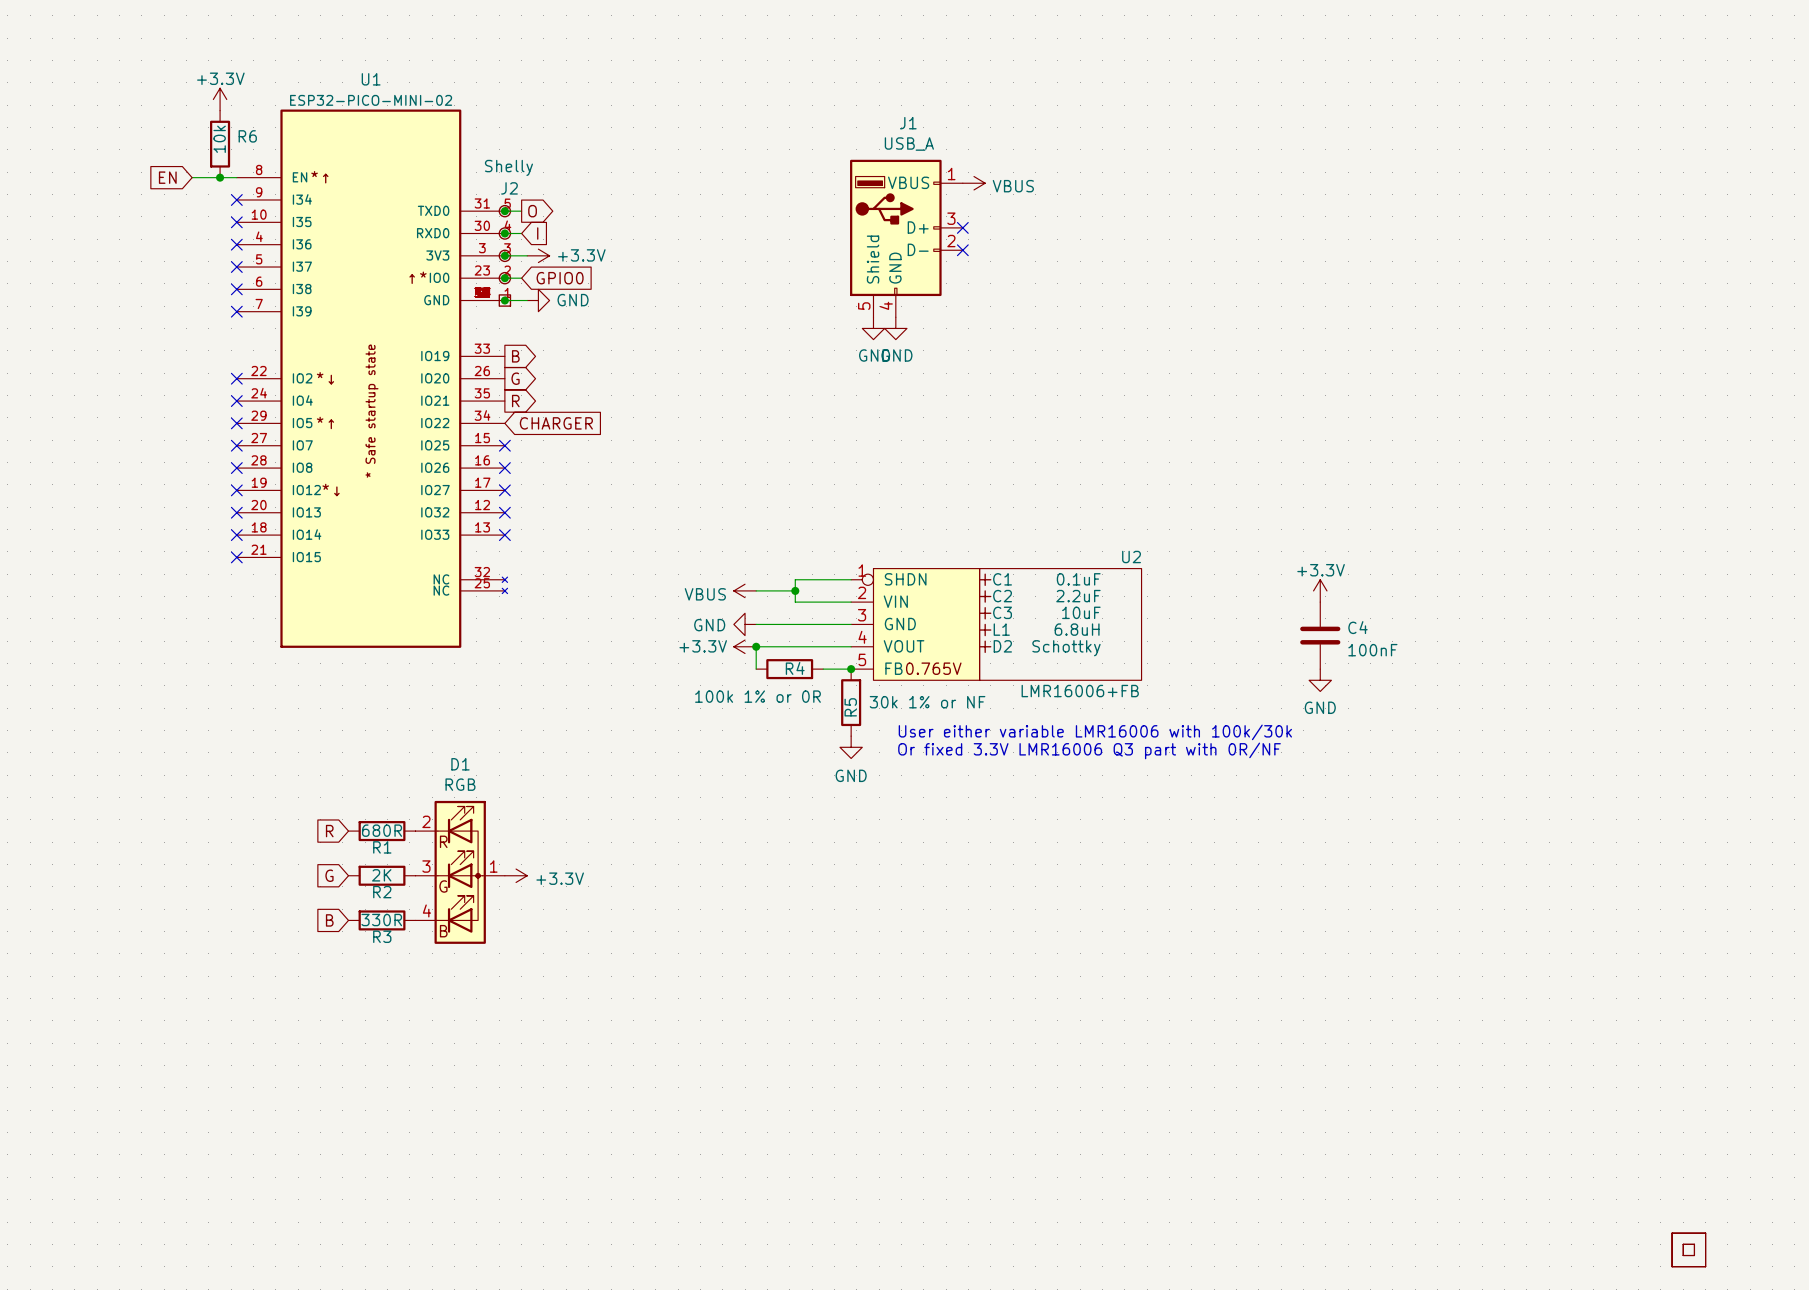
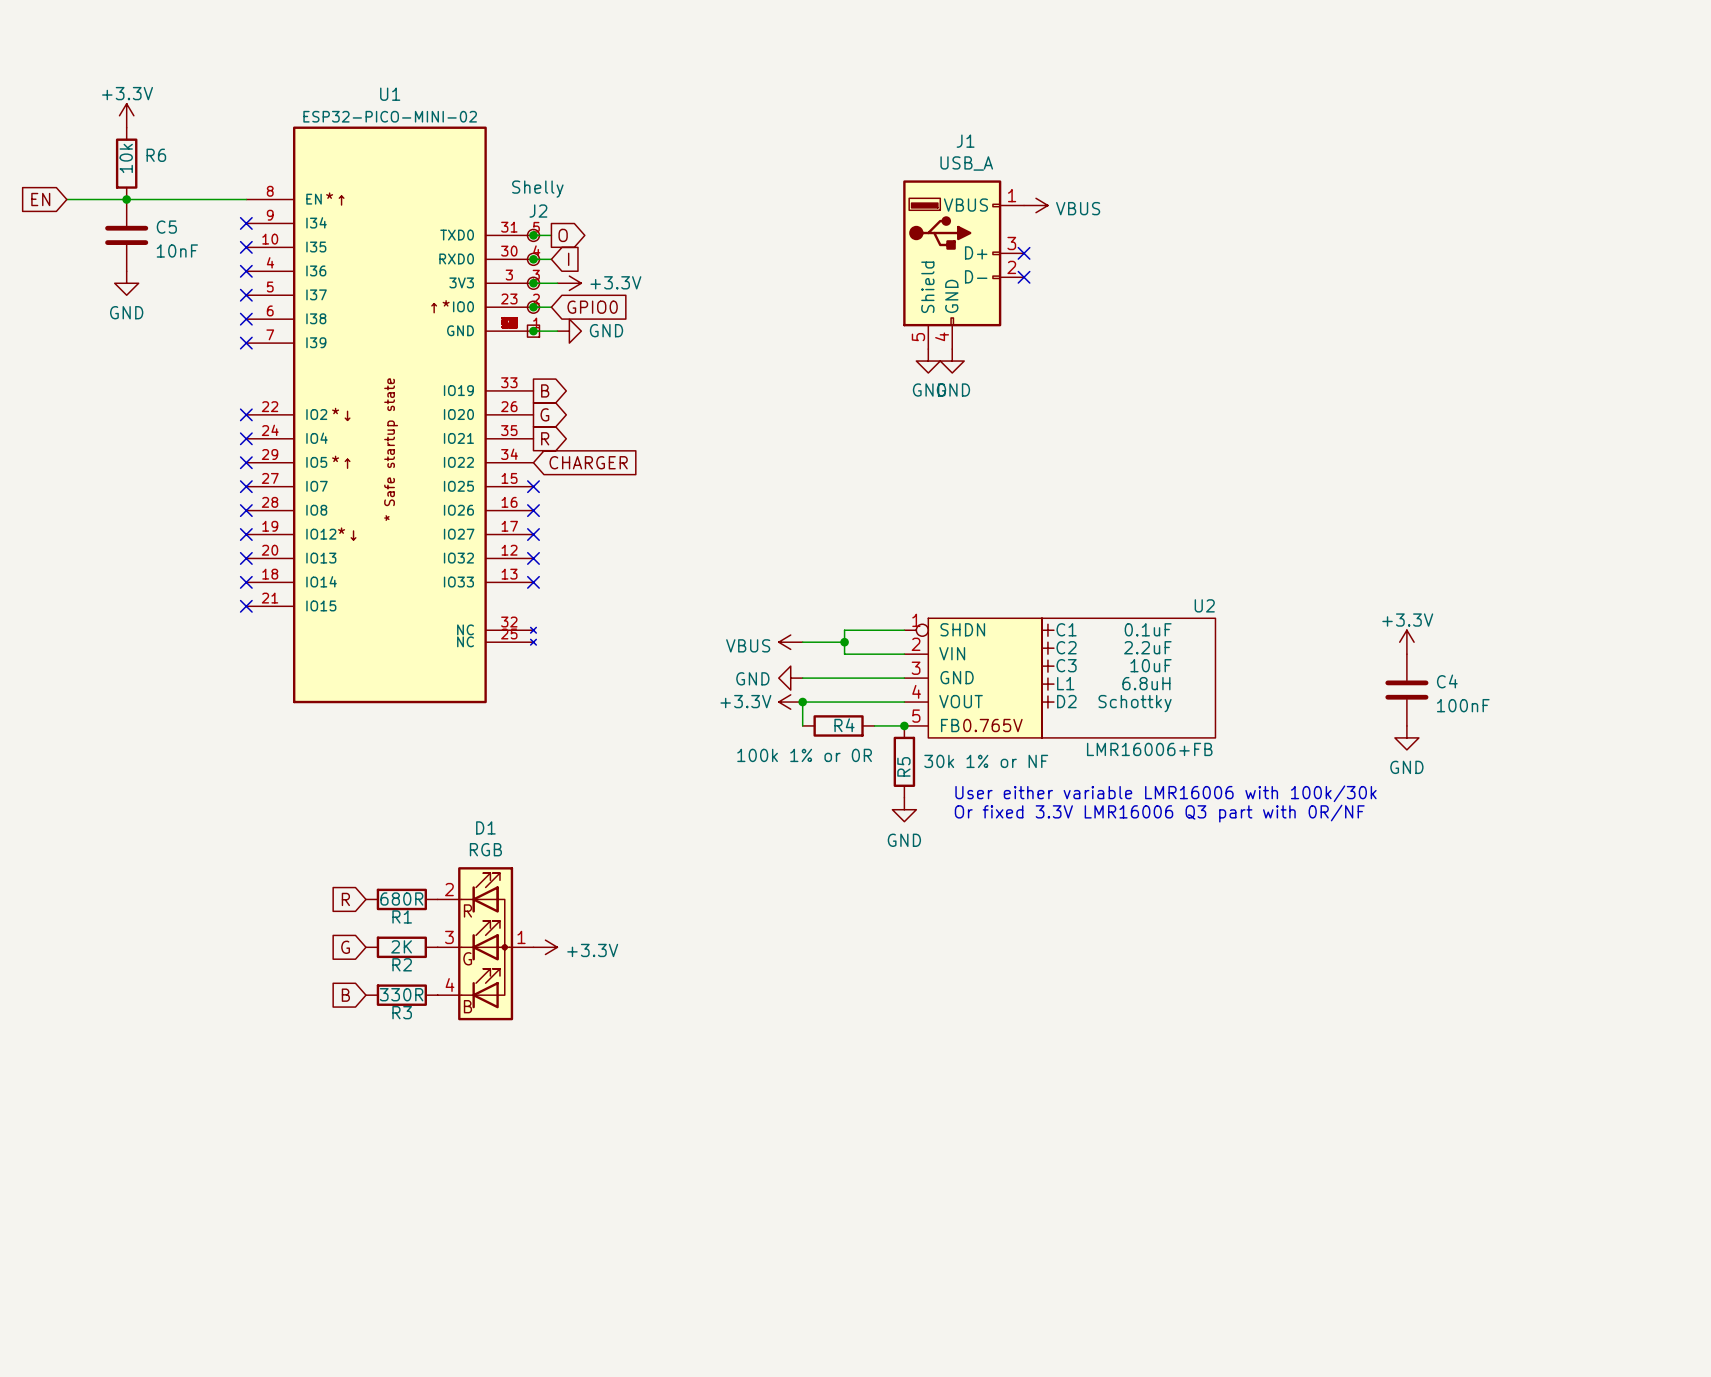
power symbol position: +3.3V (220, 99) -> +3.3V (126, 115)
R6 position: (220, 144) -> (126, 163)
wire: none -> (66, 199) (198, 199)
junction: none -> (126, 199)
global label position: EN (167, 177) -> EN (40, 199)
junction: (220, 177) -> none
C5: none -> 10nF (126, 235)
power symbol: none -> GND (126, 283)

